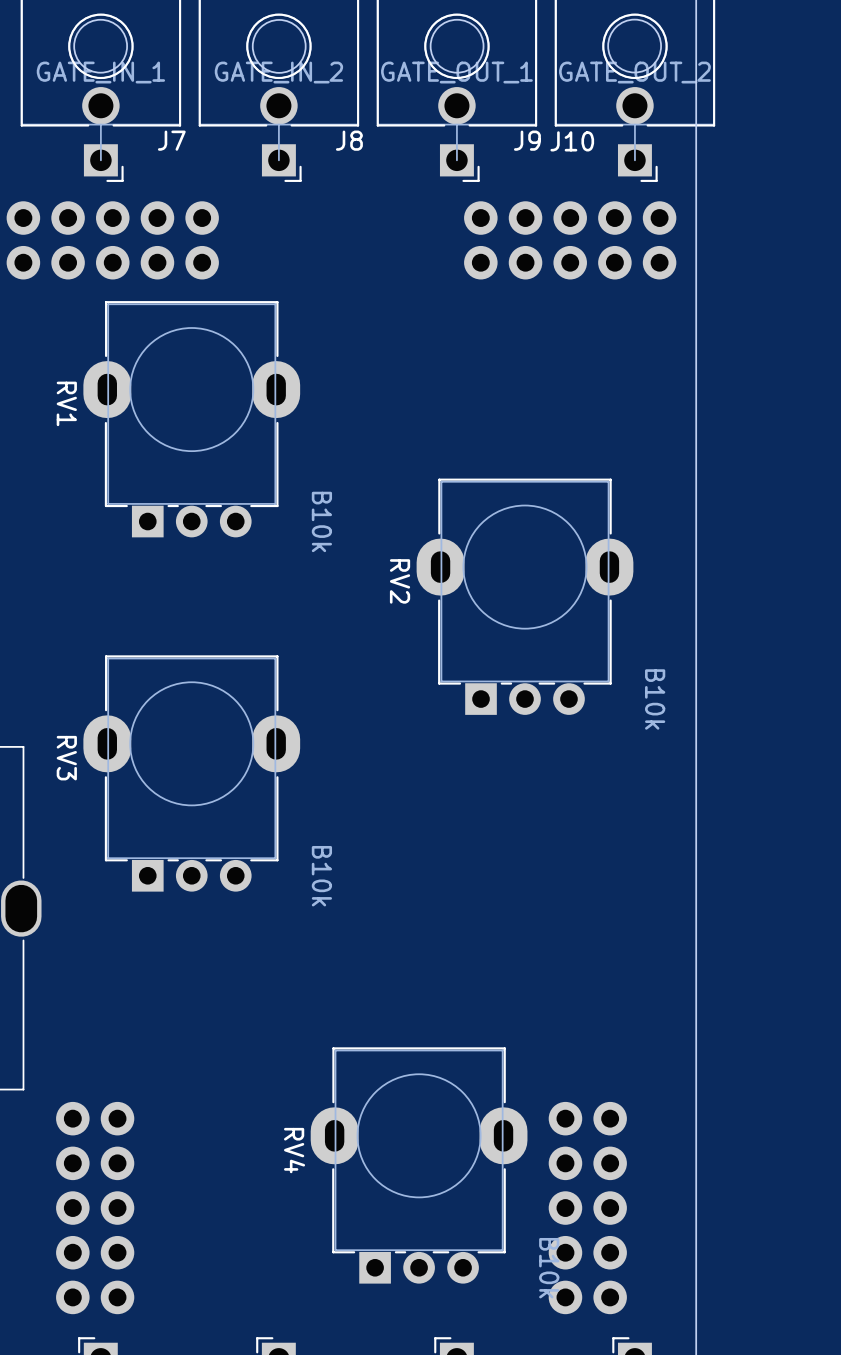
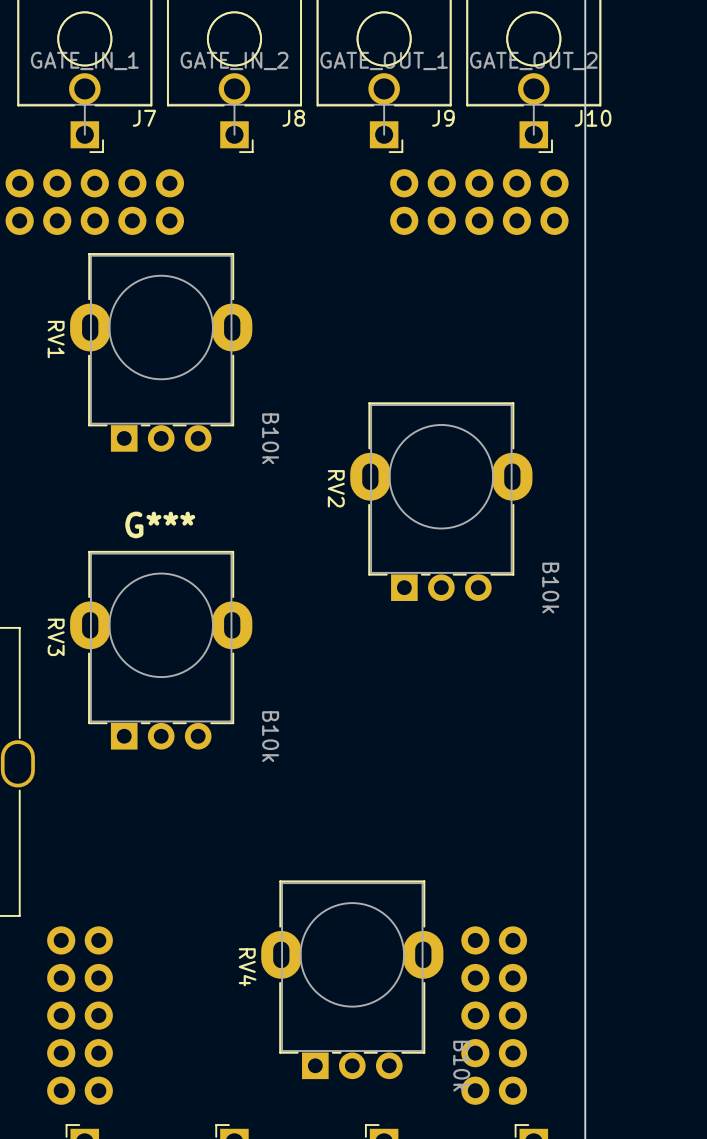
round board edge: [73, 18, 128, 74] -> none
round board edge: [429, 18, 485, 74] -> none
round board edge: [607, 18, 662, 74] -> none
round board edge: [251, 19, 307, 74] -> none
J10 name position: J10 (572, 141) -> J10 (593, 118)
G***: none -> (160, 524)

